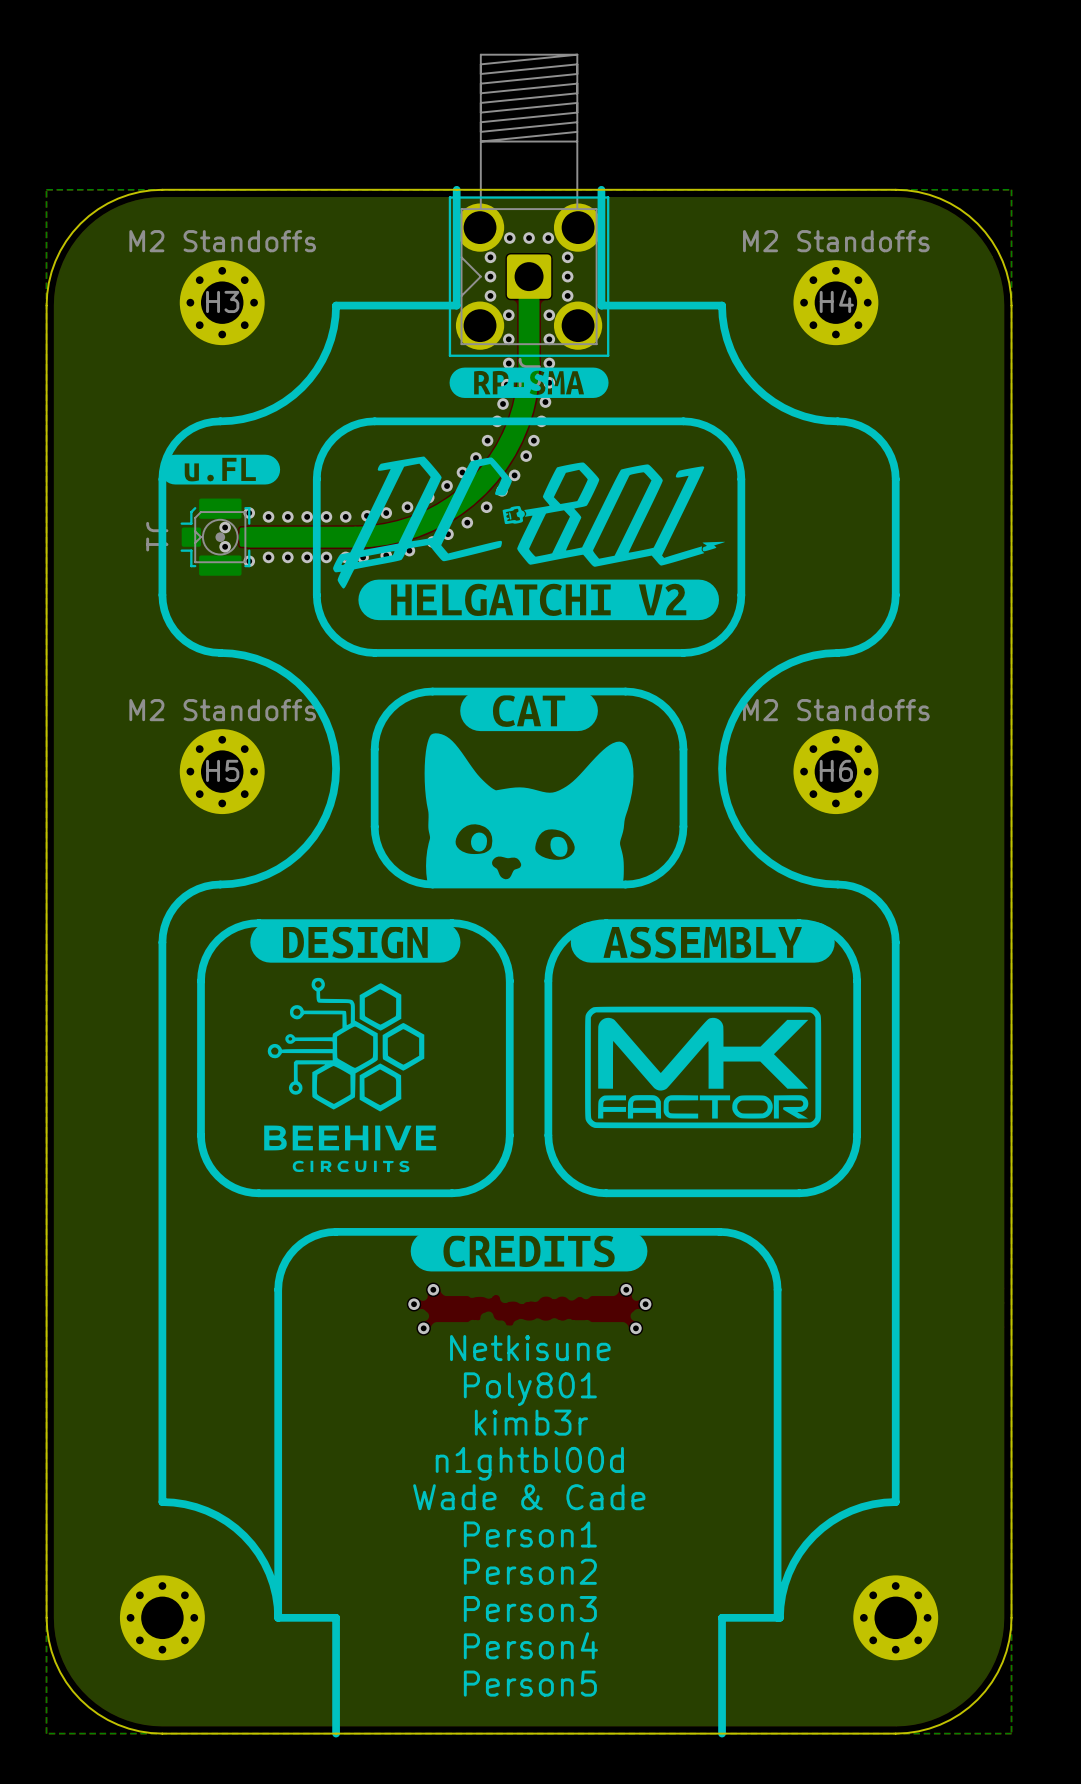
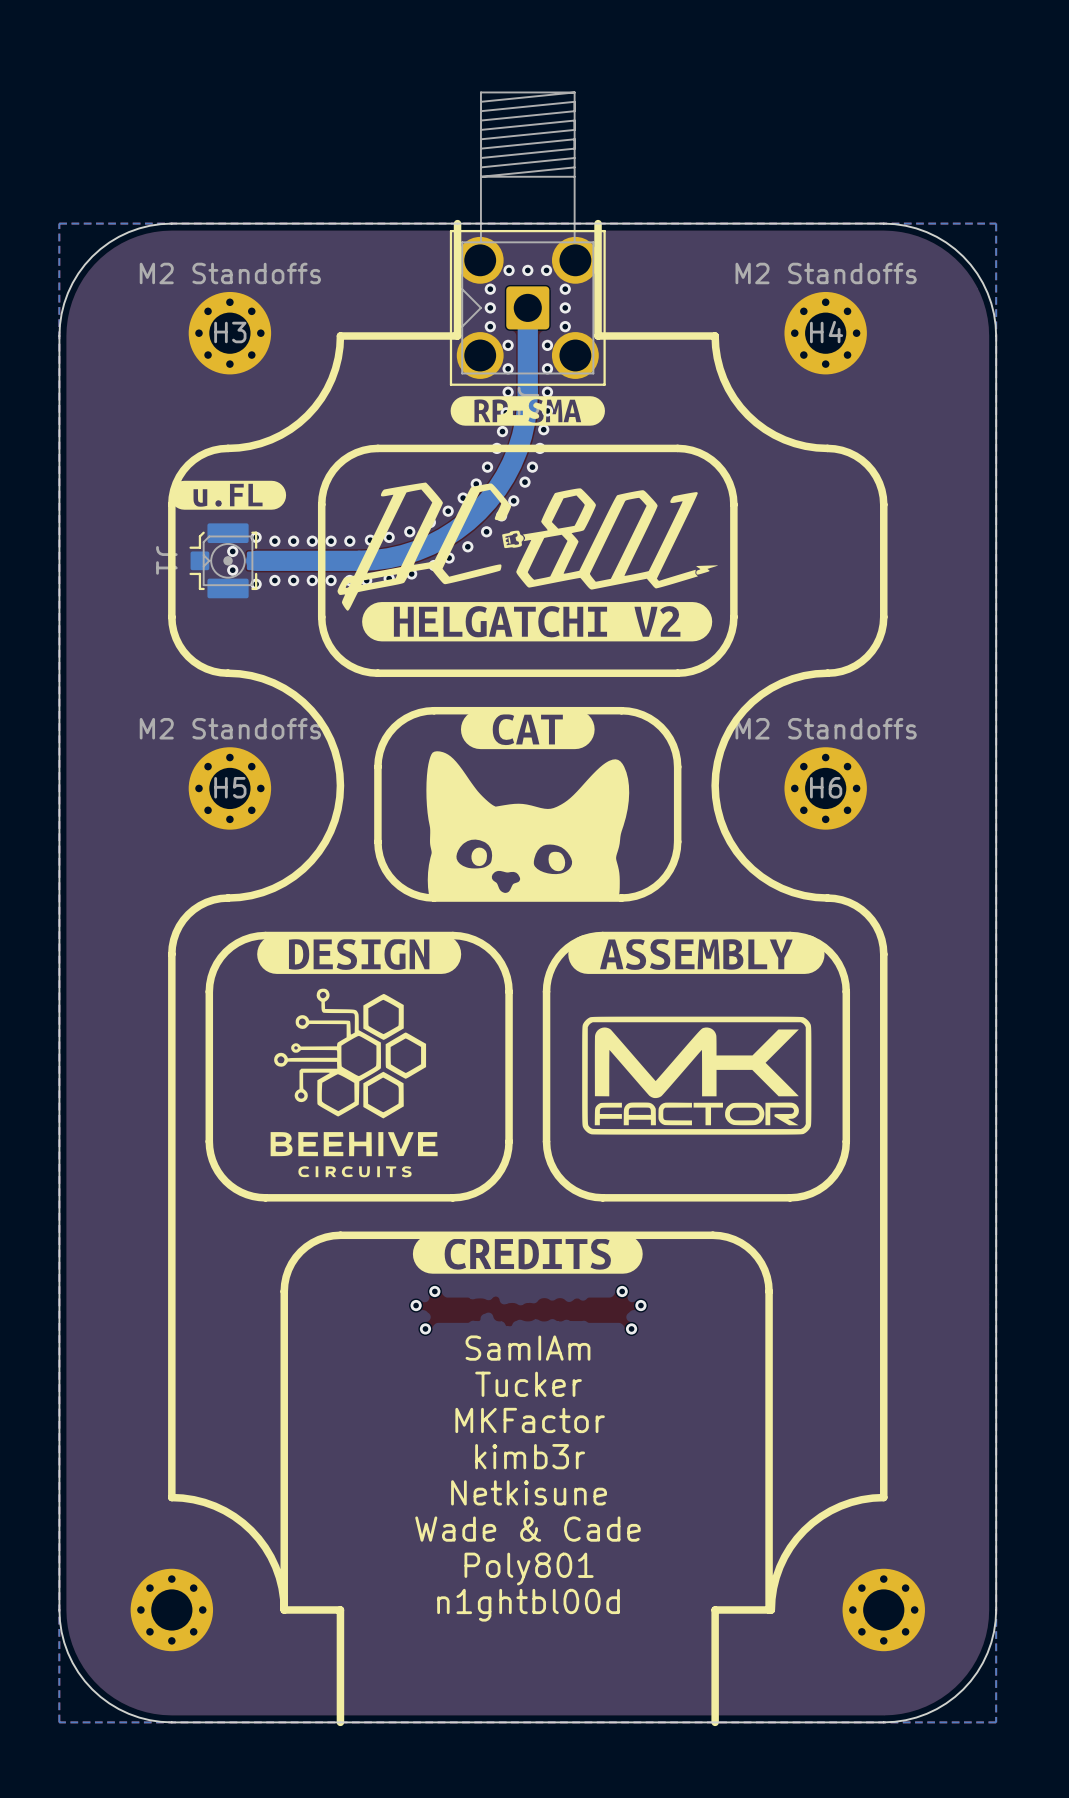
text: Netkisune (530, 1348) -> SamIAm (527, 1348)
text: Poly801 (530, 1389) -> Tucker (528, 1384)
text: kimb3r (531, 1422) -> MKFactor (530, 1420)
text: n1ghtbl00d (529, 1463) -> kimb3r (530, 1456)
text: Wade & Cade (529, 1497) -> Netkisune (529, 1492)
text: Person1 (530, 1534) -> Wade & Cade (527, 1529)
text: Person2 (530, 1571) -> Poly801 (529, 1569)
text: Person3 (530, 1609) -> n1ghtbl00d (528, 1605)
text: Person4 (530, 1645) -> none
text: Person5 (530, 1683) -> none

